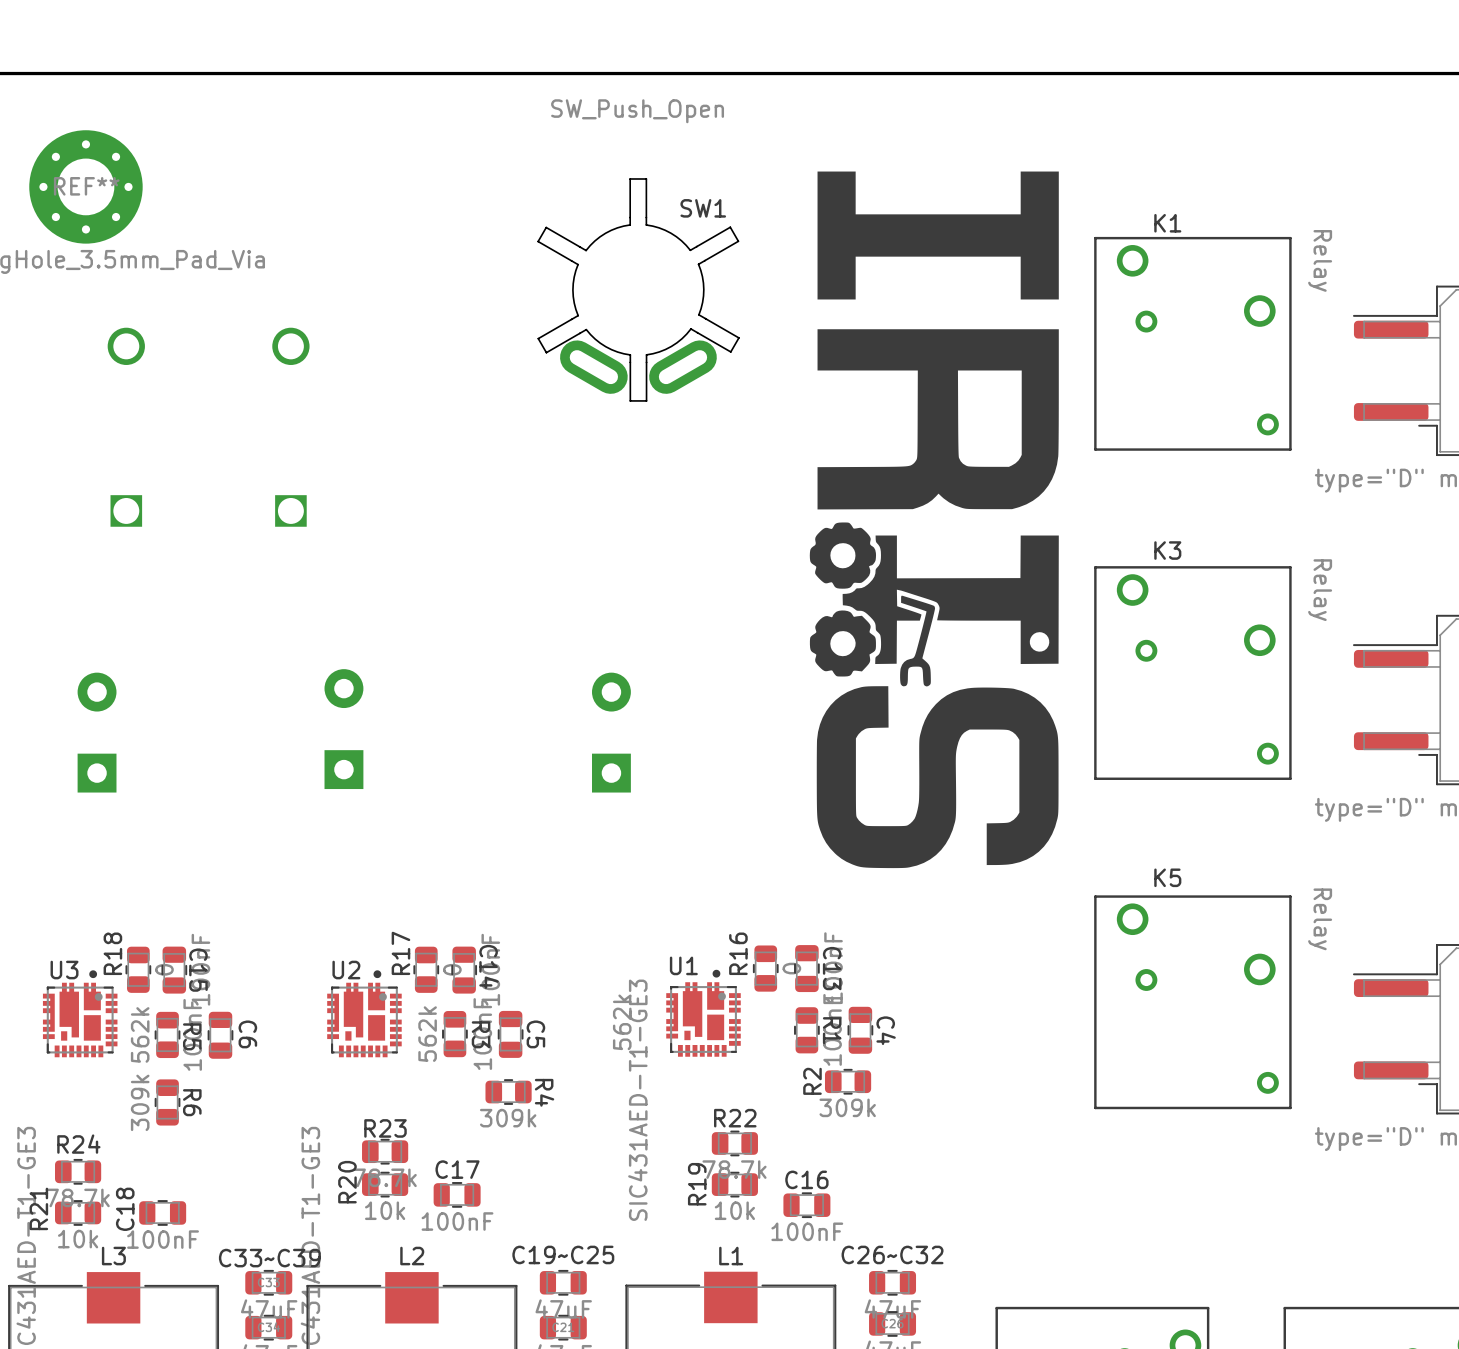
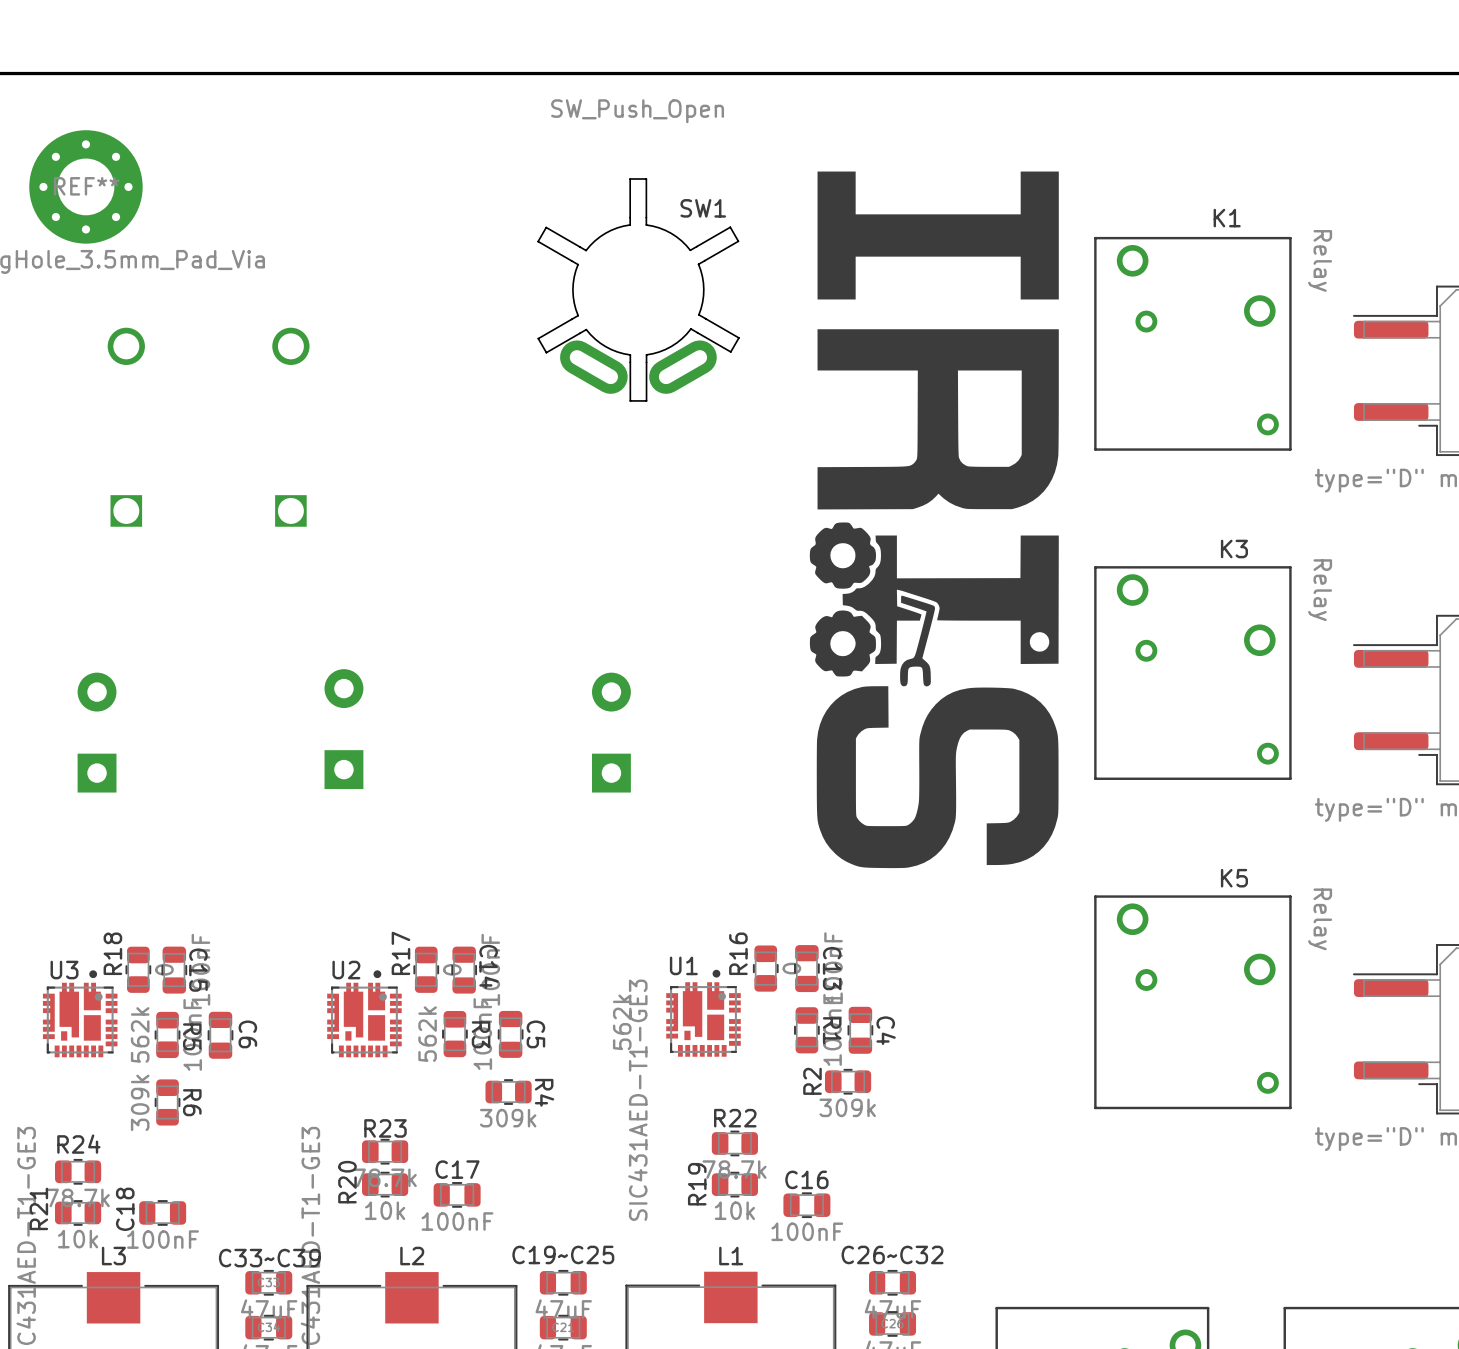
K1 name position: K1 (1167, 223) -> K1 (1227, 218)
K3 name position: K3 (1167, 550) -> K3 (1234, 548)
K5 name position: K5 (1167, 877) -> K5 (1234, 878)

